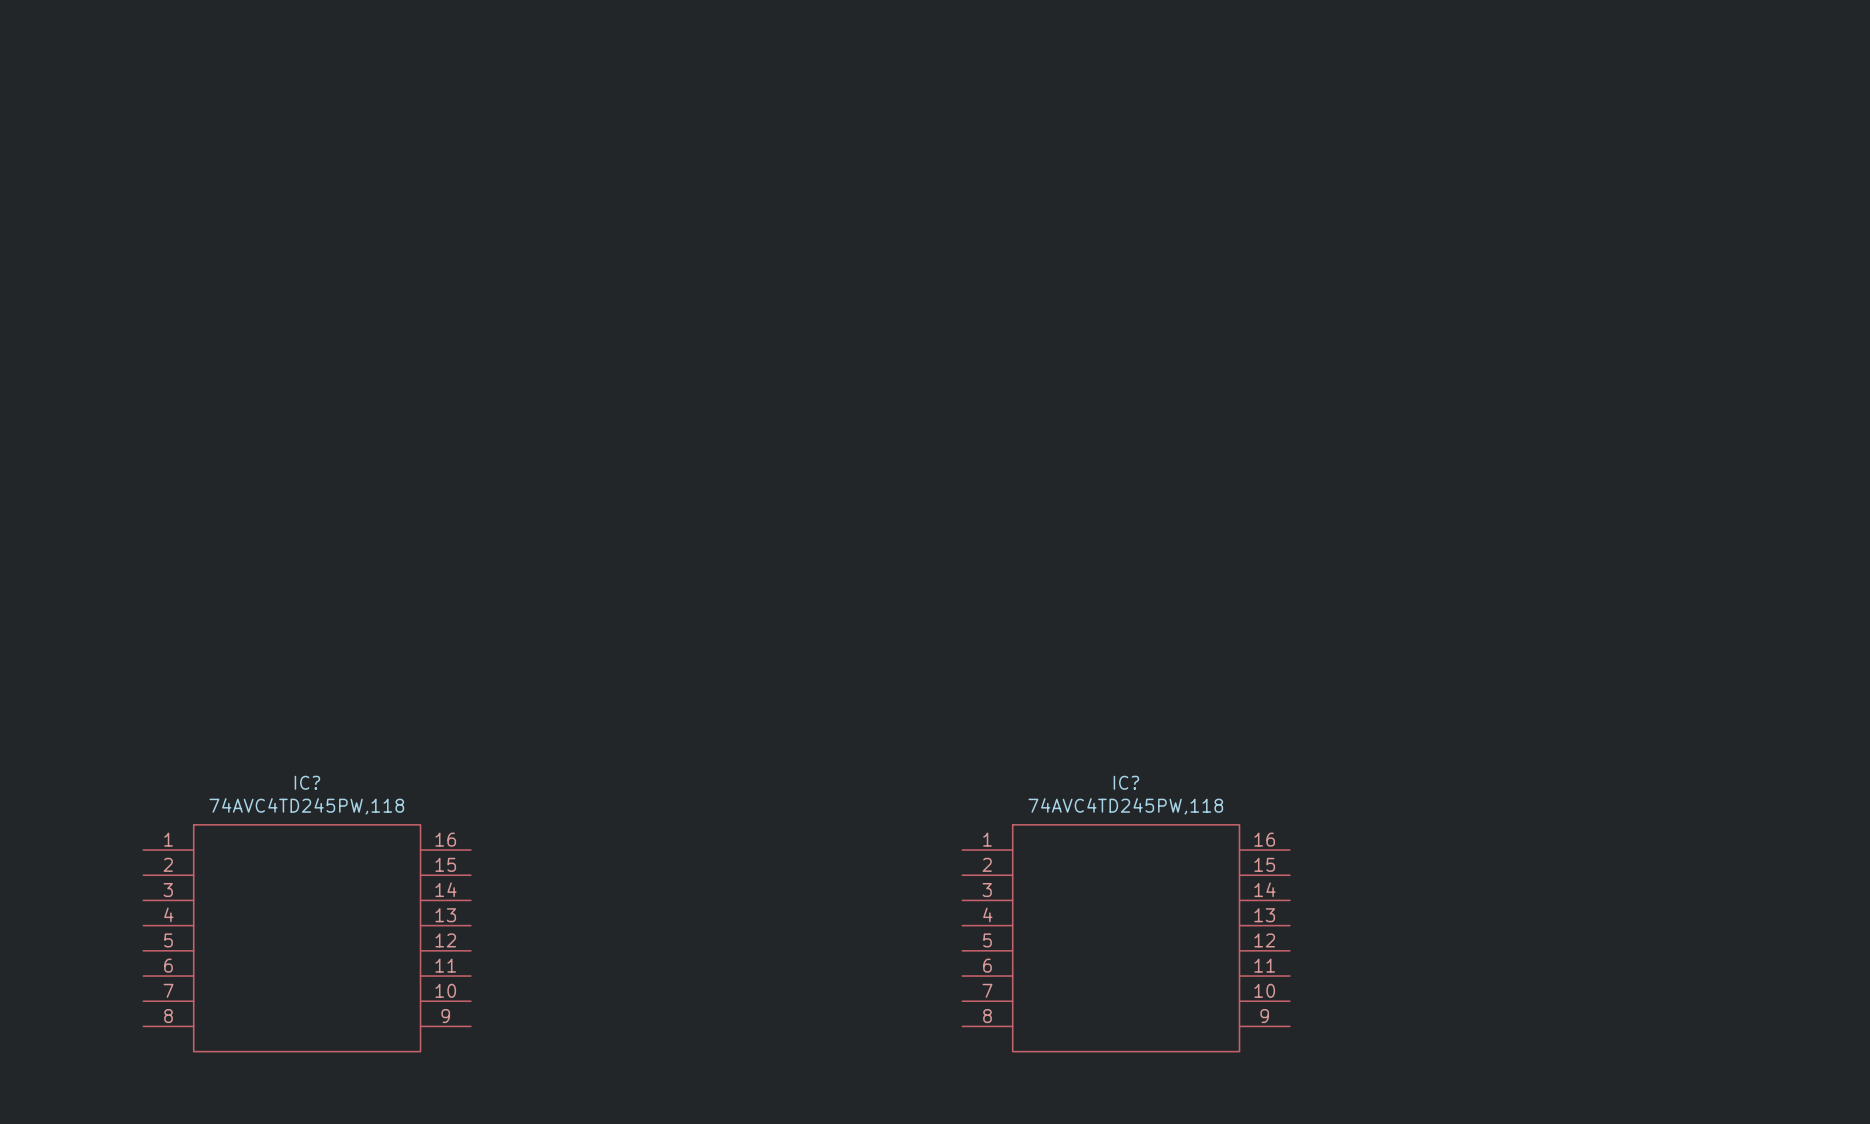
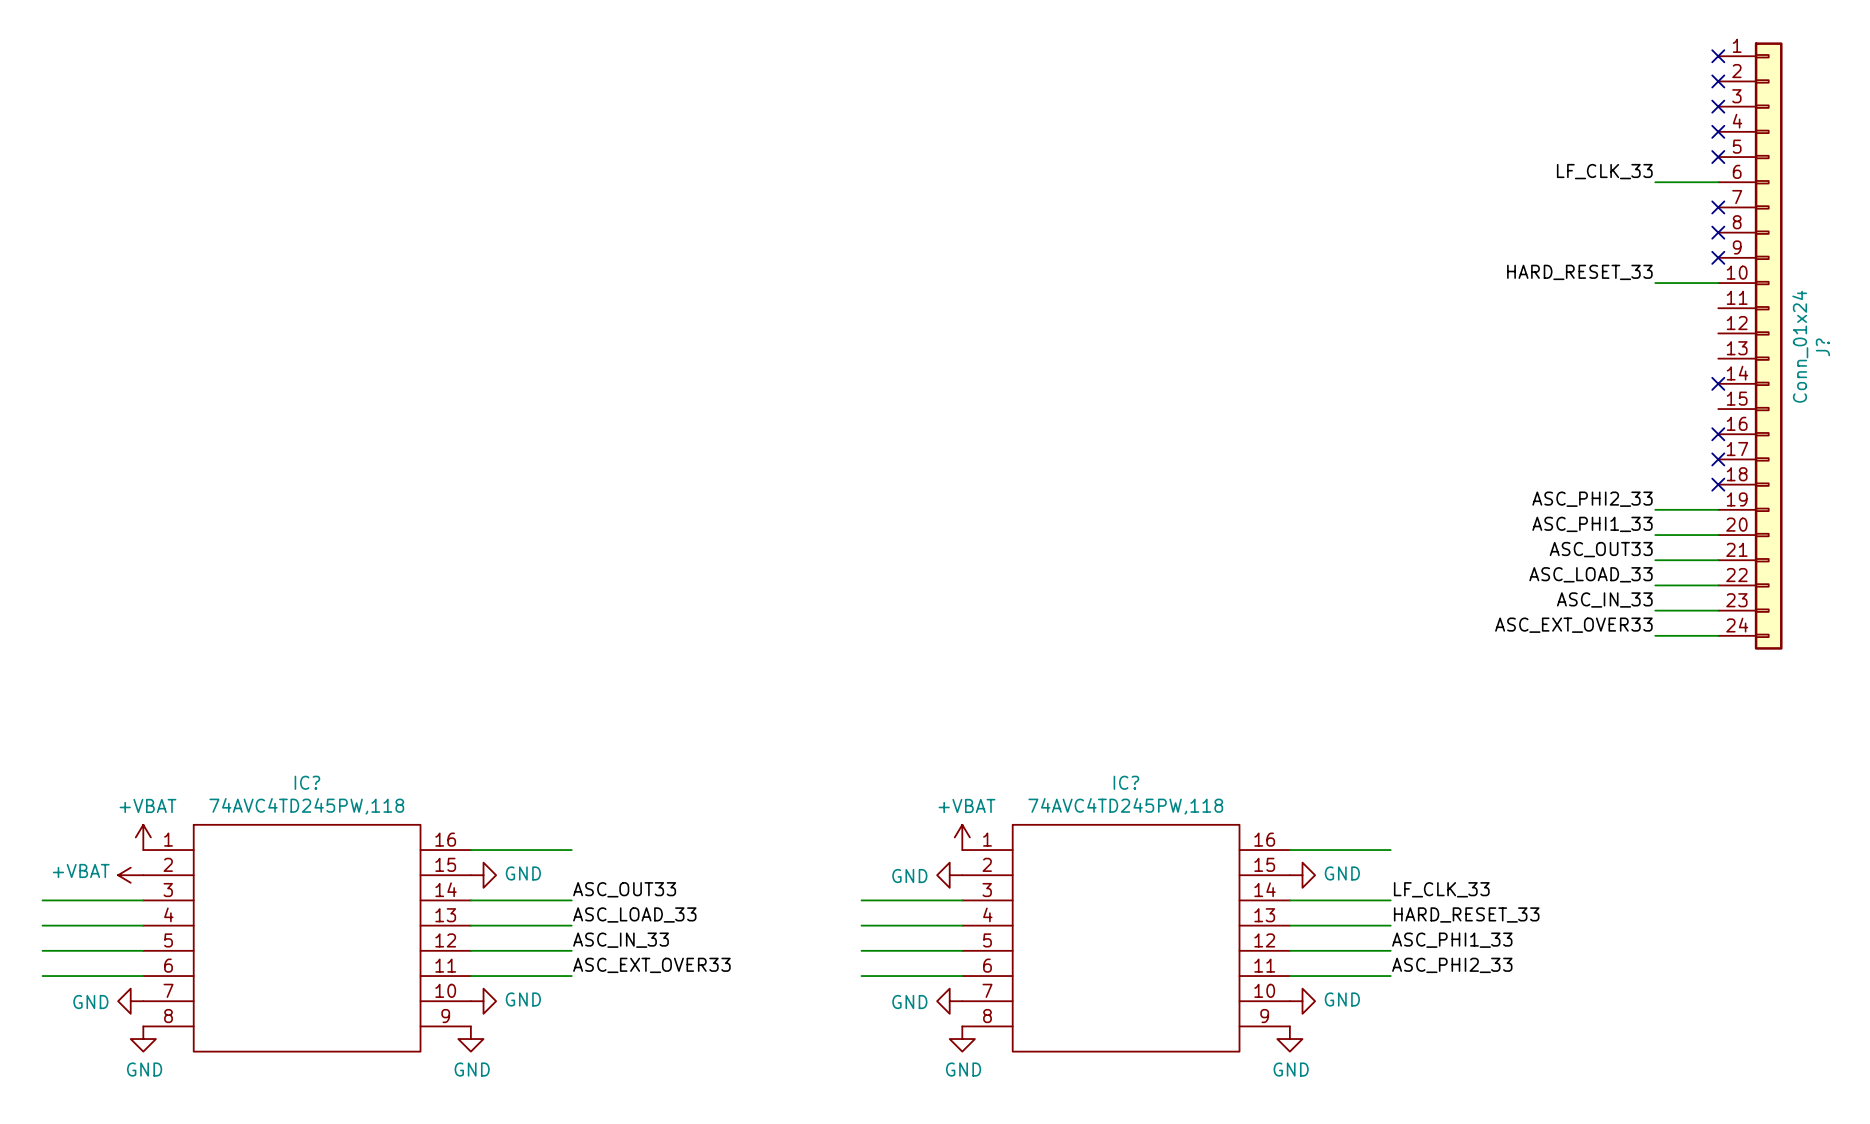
no-connect mark: none -> (1718, 56)
no-connect mark: none -> (1718, 81)
no-connect mark: none -> (1718, 106)
no-connect mark: none -> (1718, 131)
no-connect mark: none -> (1718, 157)
label: none -> LF_CLK_33 (1604, 171)
wire: none -> (1655, 182) (1718, 182)
no-connect mark: none -> (1718, 207)
no-connect mark: none -> (1718, 232)
no-connect mark: none -> (1718, 257)
label: none -> HARD_RESET_33 (1579, 272)
wire: none -> (1655, 283) (1718, 283)
J?: none -> Conn_01x24 (1750, 346)
no-connect mark: none -> (1718, 383)
no-connect mark: none -> (1718, 434)
no-connect mark: none -> (1718, 459)
no-connect mark: none -> (1718, 484)
label: none -> ASC_PHI2_33 (1592, 499)
wire: none -> (1655, 509) (1718, 509)
label: none -> ASC_PHI1_33 (1592, 524)
wire: none -> (1655, 535) (1718, 535)
label: none -> ASC_OUT33 (1601, 549)
wire: none -> (1655, 560) (1718, 560)
label: none -> ASC_LOAD_33 (1591, 574)
wire: none -> (1655, 585) (1718, 585)
label: none -> ASC_IN_33 (1604, 599)
wire: none -> (1655, 610) (1718, 610)
label: none -> ASC_EXT_OVER33 (1573, 625)
wire: none -> (1655, 635) (1718, 635)
power symbol: none -> +VBAT (143, 837)
power symbol: none -> +VBAT (962, 837)
wire: none -> (470, 850) (571, 850)
wire: none -> (1289, 850) (1390, 850)
power symbol: none -> +VBAT (130, 875)
power symbol: none -> GND (483, 875)
power symbol: none -> GND (949, 875)
power symbol: none -> GND (1302, 875)
label: none -> ASC_OUT33 (624, 889)
label: none -> LF_CLK_33 (1441, 889)
wire: none -> (42, 900) (143, 900)
wire: none -> (470, 900) (571, 900)
wire: none -> (861, 900) (962, 900)
wire: none -> (1289, 900) (1390, 900)
label: none -> ASC_LOAD_33 (634, 914)
label: none -> HARD_RESET_33 (1466, 914)
wire: none -> (42, 925) (143, 925)
wire: none -> (470, 925) (571, 925)
wire: none -> (861, 925) (962, 925)
wire: none -> (1289, 925) (1390, 925)
label: none -> ASC_IN_33 (621, 940)
label: none -> ASC_PHI1_33 (1452, 940)
wire: none -> (42, 950) (143, 950)
wire: none -> (470, 950) (571, 950)
wire: none -> (861, 950) (962, 950)
wire: none -> (1289, 950) (1390, 950)
label: none -> ASC_EXT_OVER33 (651, 965)
label: none -> ASC_PHI2_33 (1452, 965)
wire: none -> (42, 976) (143, 976)
wire: none -> (470, 976) (571, 976)
wire: none -> (861, 976) (962, 976)
wire: none -> (1289, 976) (1390, 976)
power symbol: none -> GND (130, 1001)
power symbol: none -> GND (483, 1001)
power symbol: none -> GND (949, 1001)
power symbol: none -> GND (1302, 1001)
power symbol: none -> GND (143, 1039)
power symbol: none -> GND (470, 1039)
power symbol: none -> GND (962, 1039)
power symbol: none -> GND (1289, 1039)

